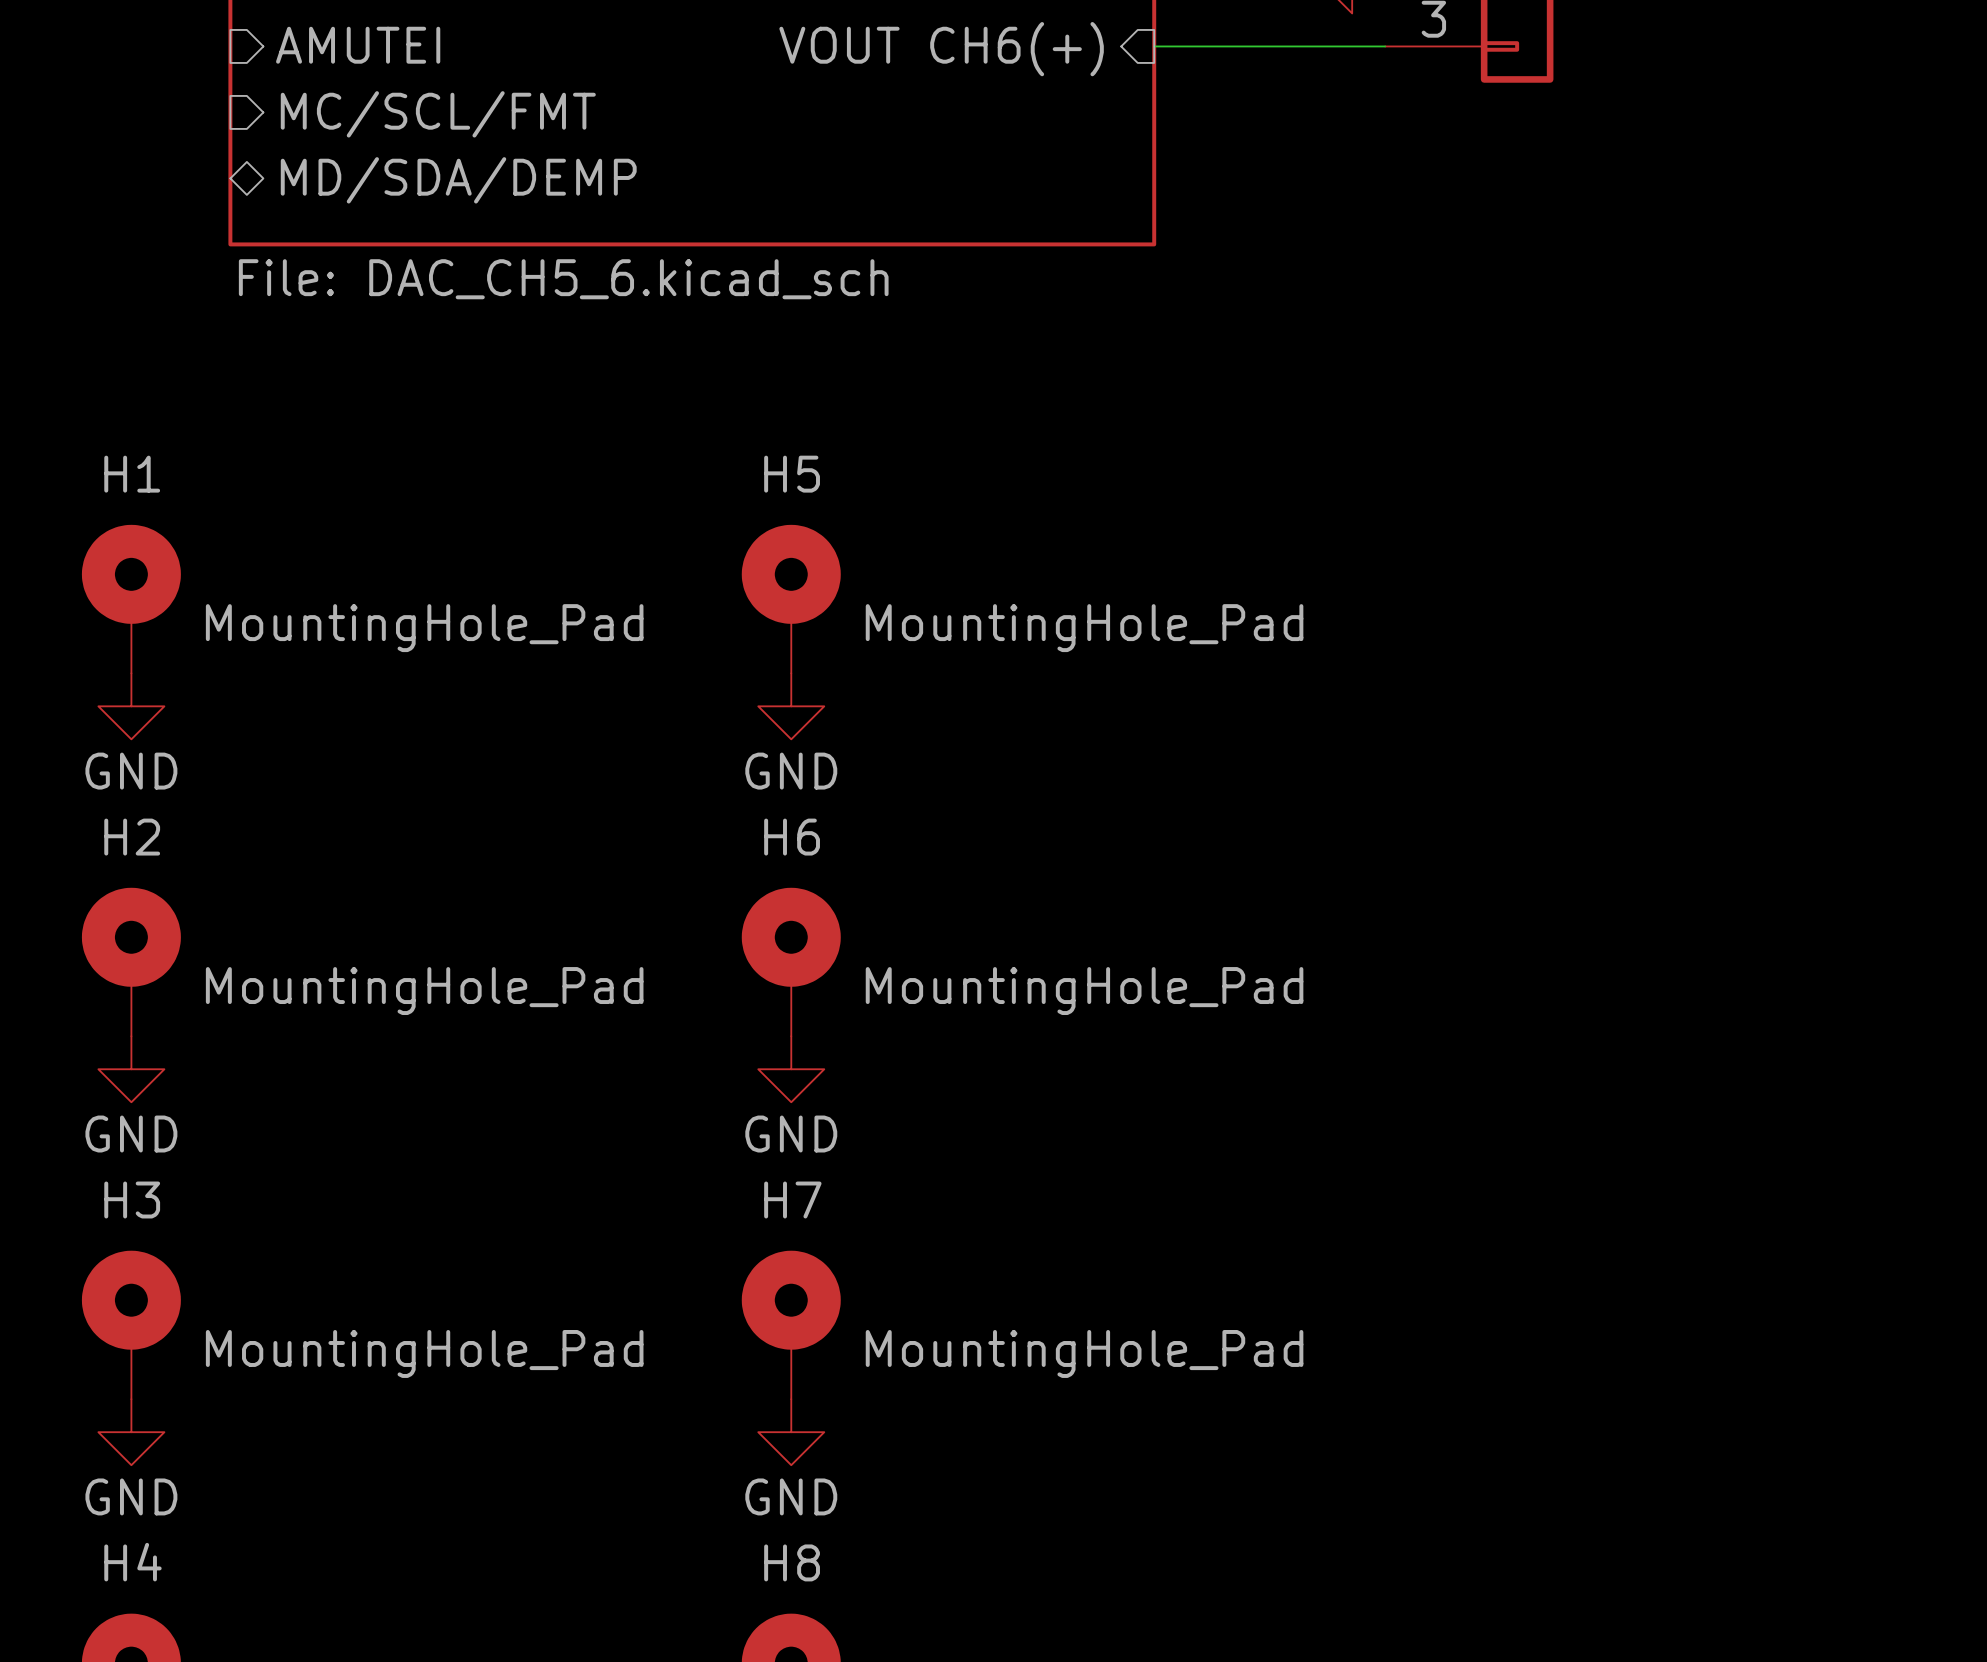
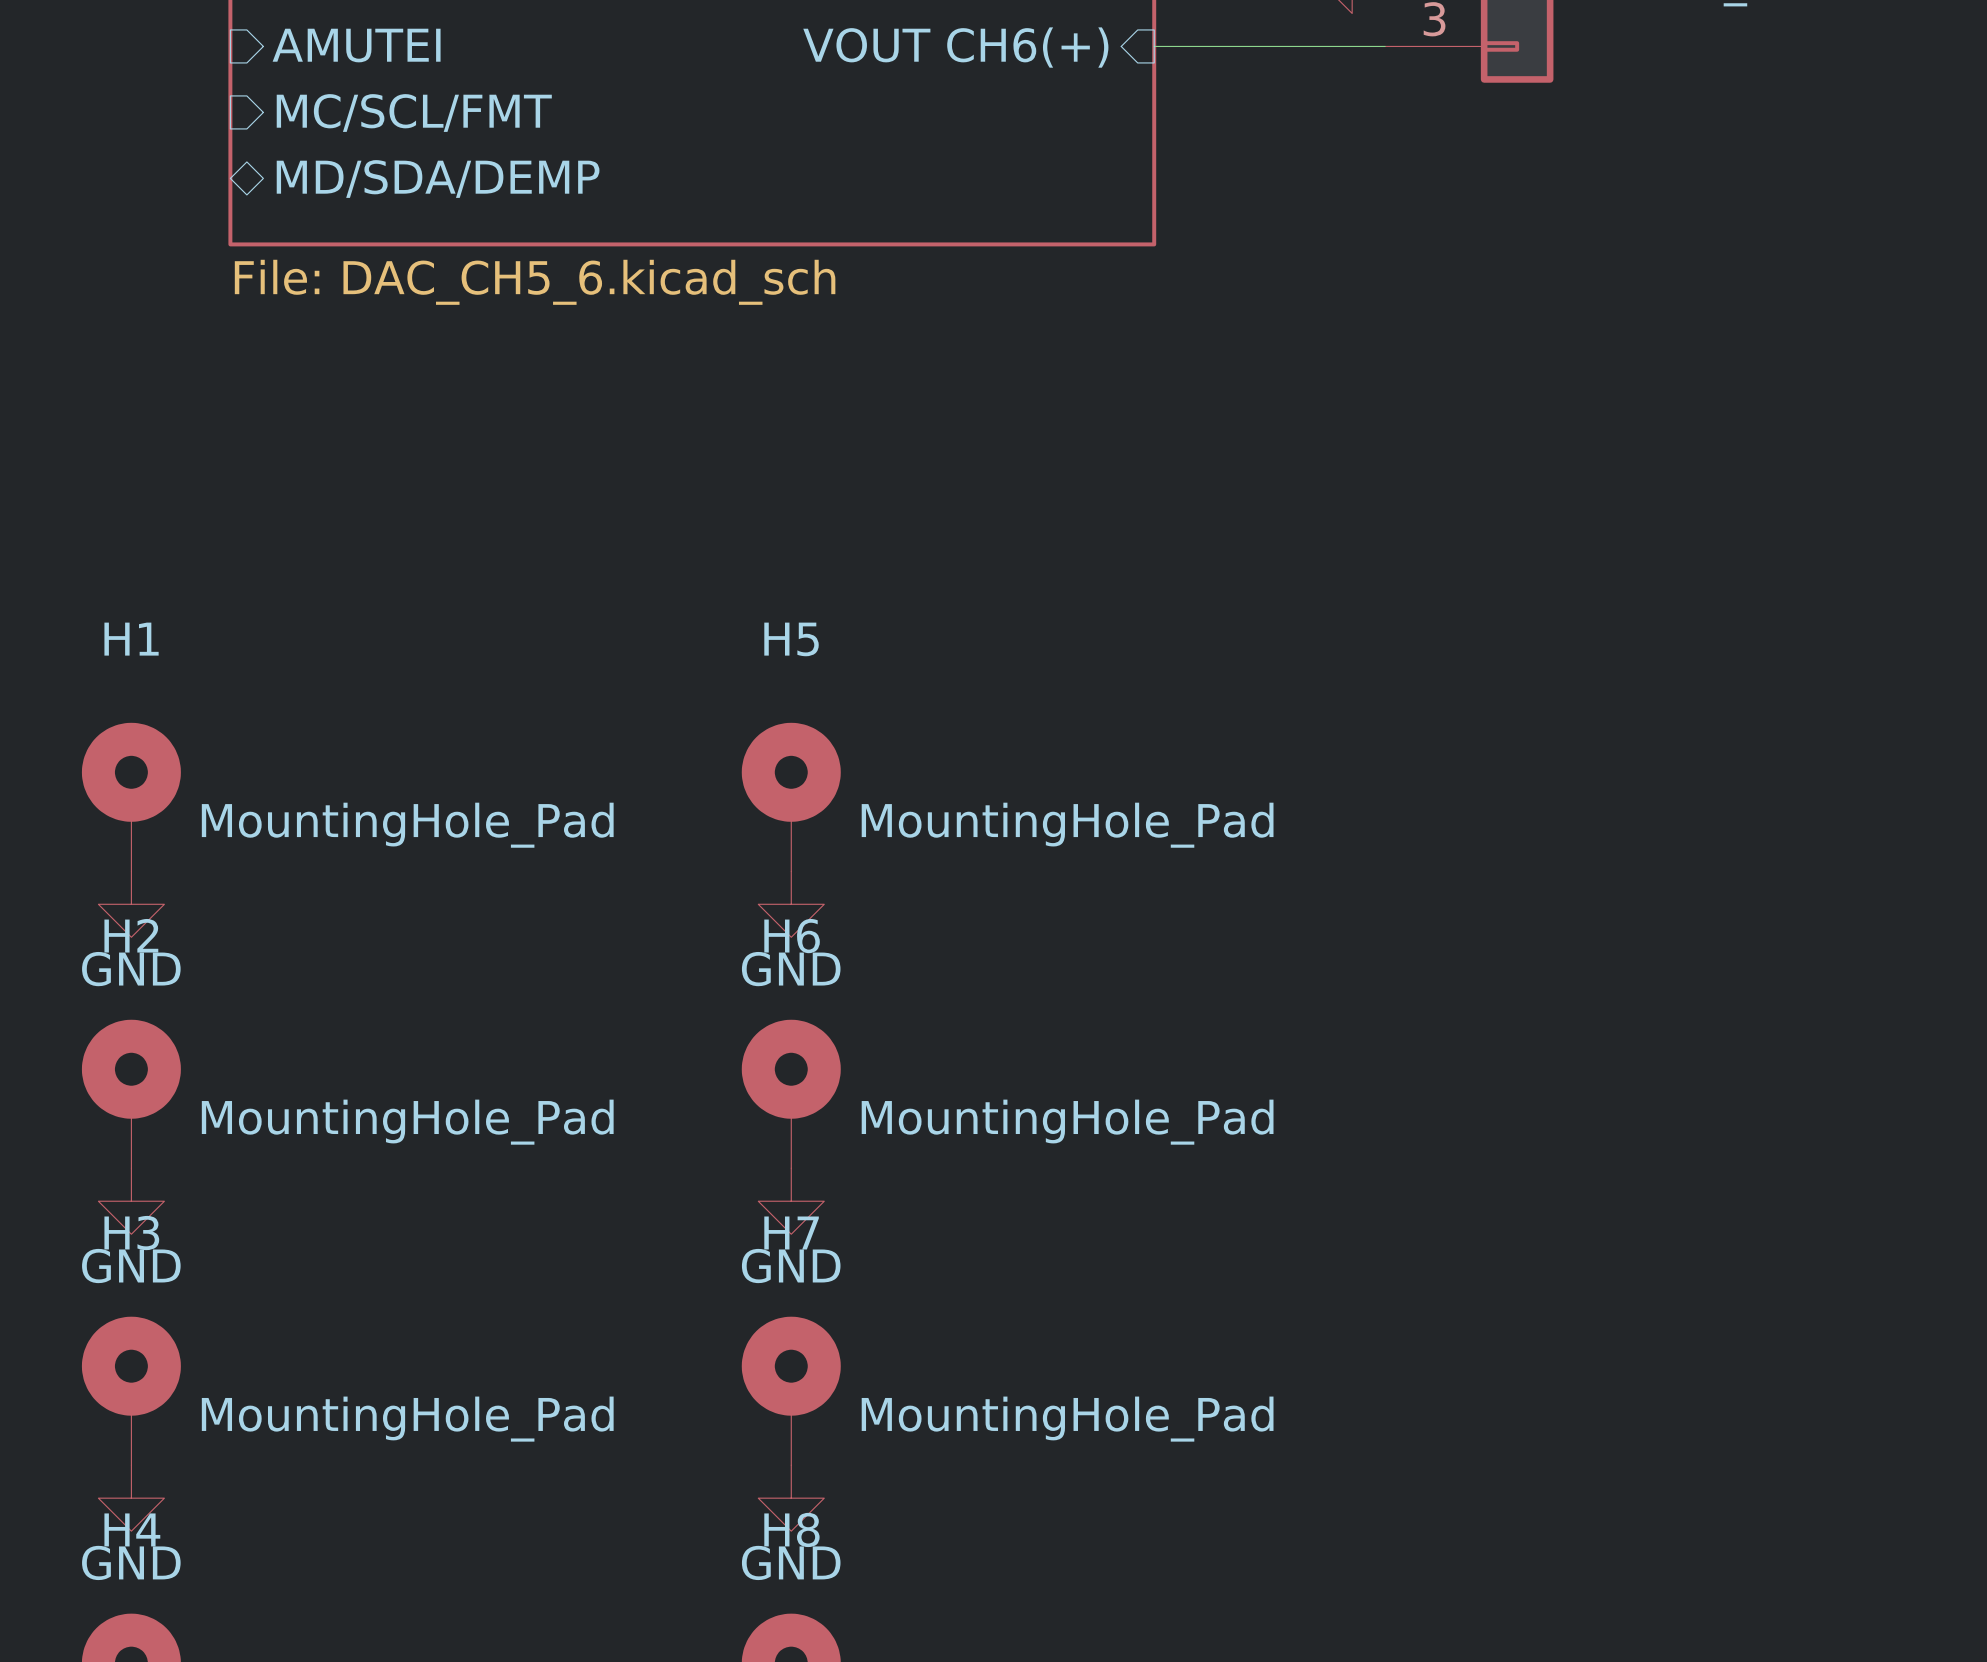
H1 name position: H1 (132, 474) -> H1 (131, 639)
H5 name position: H5 (792, 474) -> H5 (791, 639)
H1 position: (131, 599) -> (131, 797)
H5 position: (791, 599) -> (791, 797)
power symbol: GND (131, 706) -> none
power symbol: GND (791, 706) -> none
H2 name position: H2 (132, 837) -> H2 (131, 935)
H6 name position: H6 (792, 837) -> H6 (792, 936)
power symbol: none -> GND (131, 904)
power symbol: none -> GND (791, 904)
H2 position: (131, 962) -> (131, 1094)
H6 position: (791, 962) -> (791, 1094)
power symbol: GND (131, 1069) -> none
power symbol: GND (791, 1069) -> none
H3 name position: H3 (132, 1200) -> H3 (131, 1233)
H7 name position: H7 (792, 1200) -> H7 (791, 1232)
power symbol: none -> GND (131, 1201)
power symbol: none -> GND (791, 1201)
H3 position: (131, 1324) -> (131, 1390)
H7 position: (791, 1324) -> (791, 1390)
power symbol position: GND (131, 1432) -> GND (131, 1498)
power symbol position: GND (791, 1432) -> GND (791, 1498)
H4 name position: H4 (132, 1562) -> H4 (132, 1529)
H8 name position: H8 (792, 1562) -> H8 (791, 1529)

